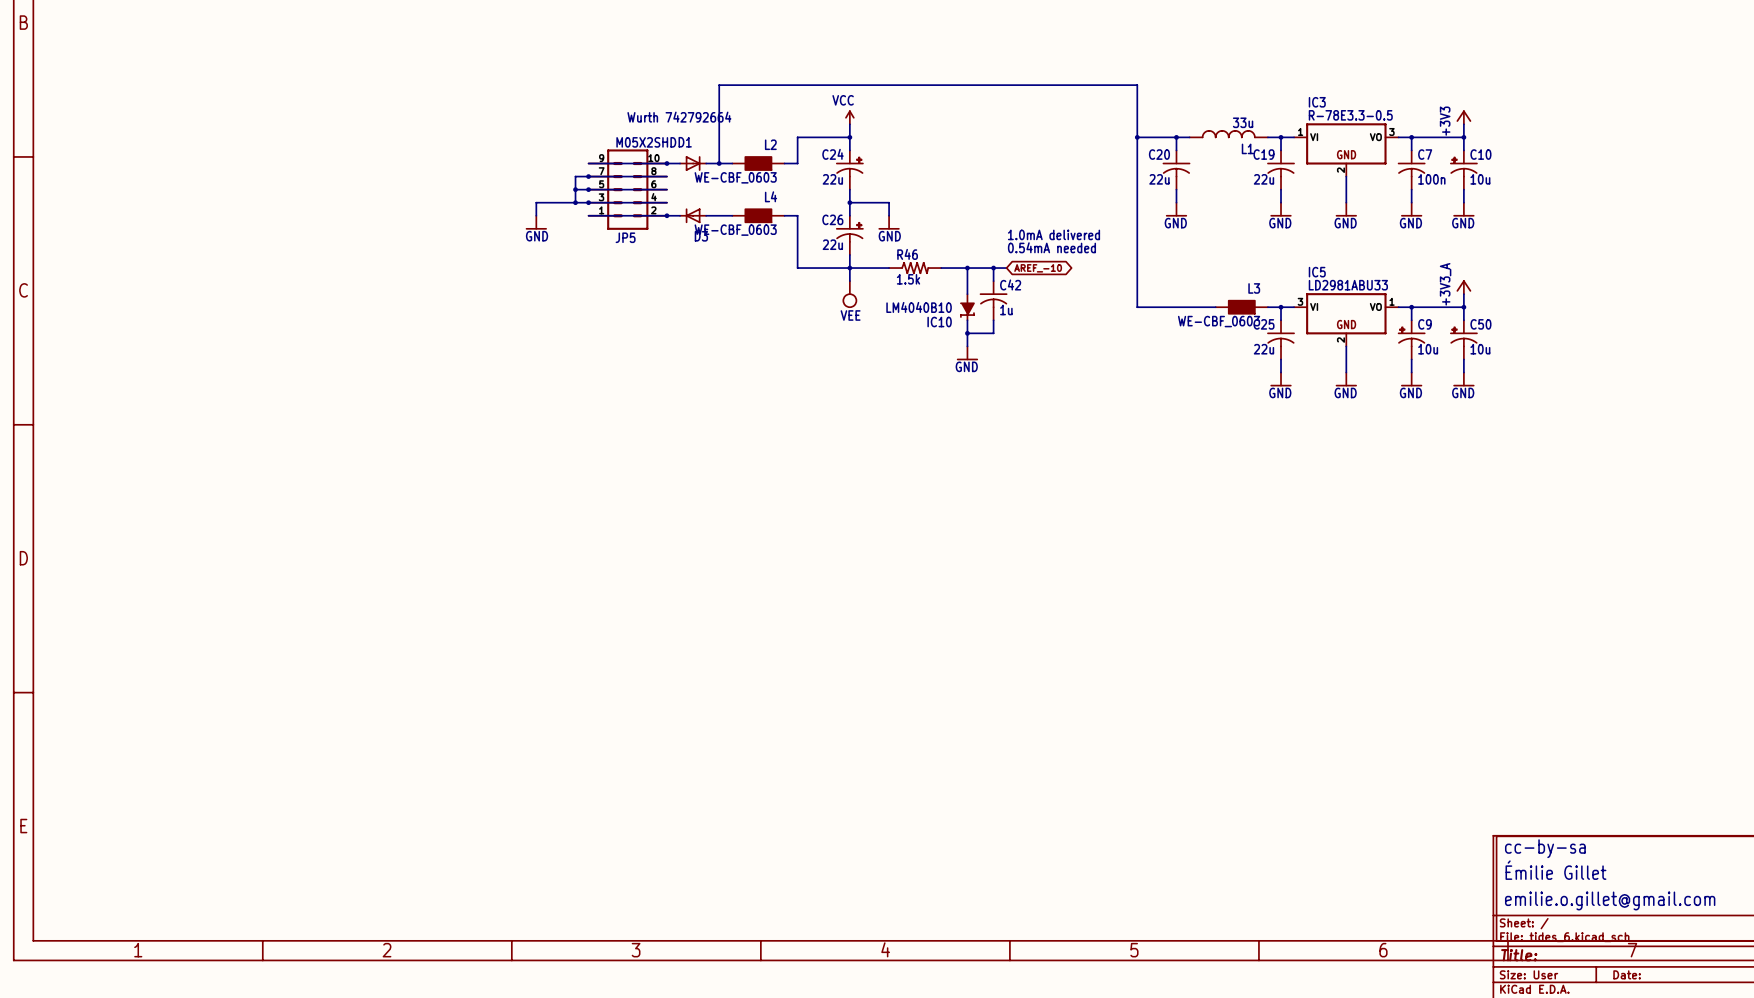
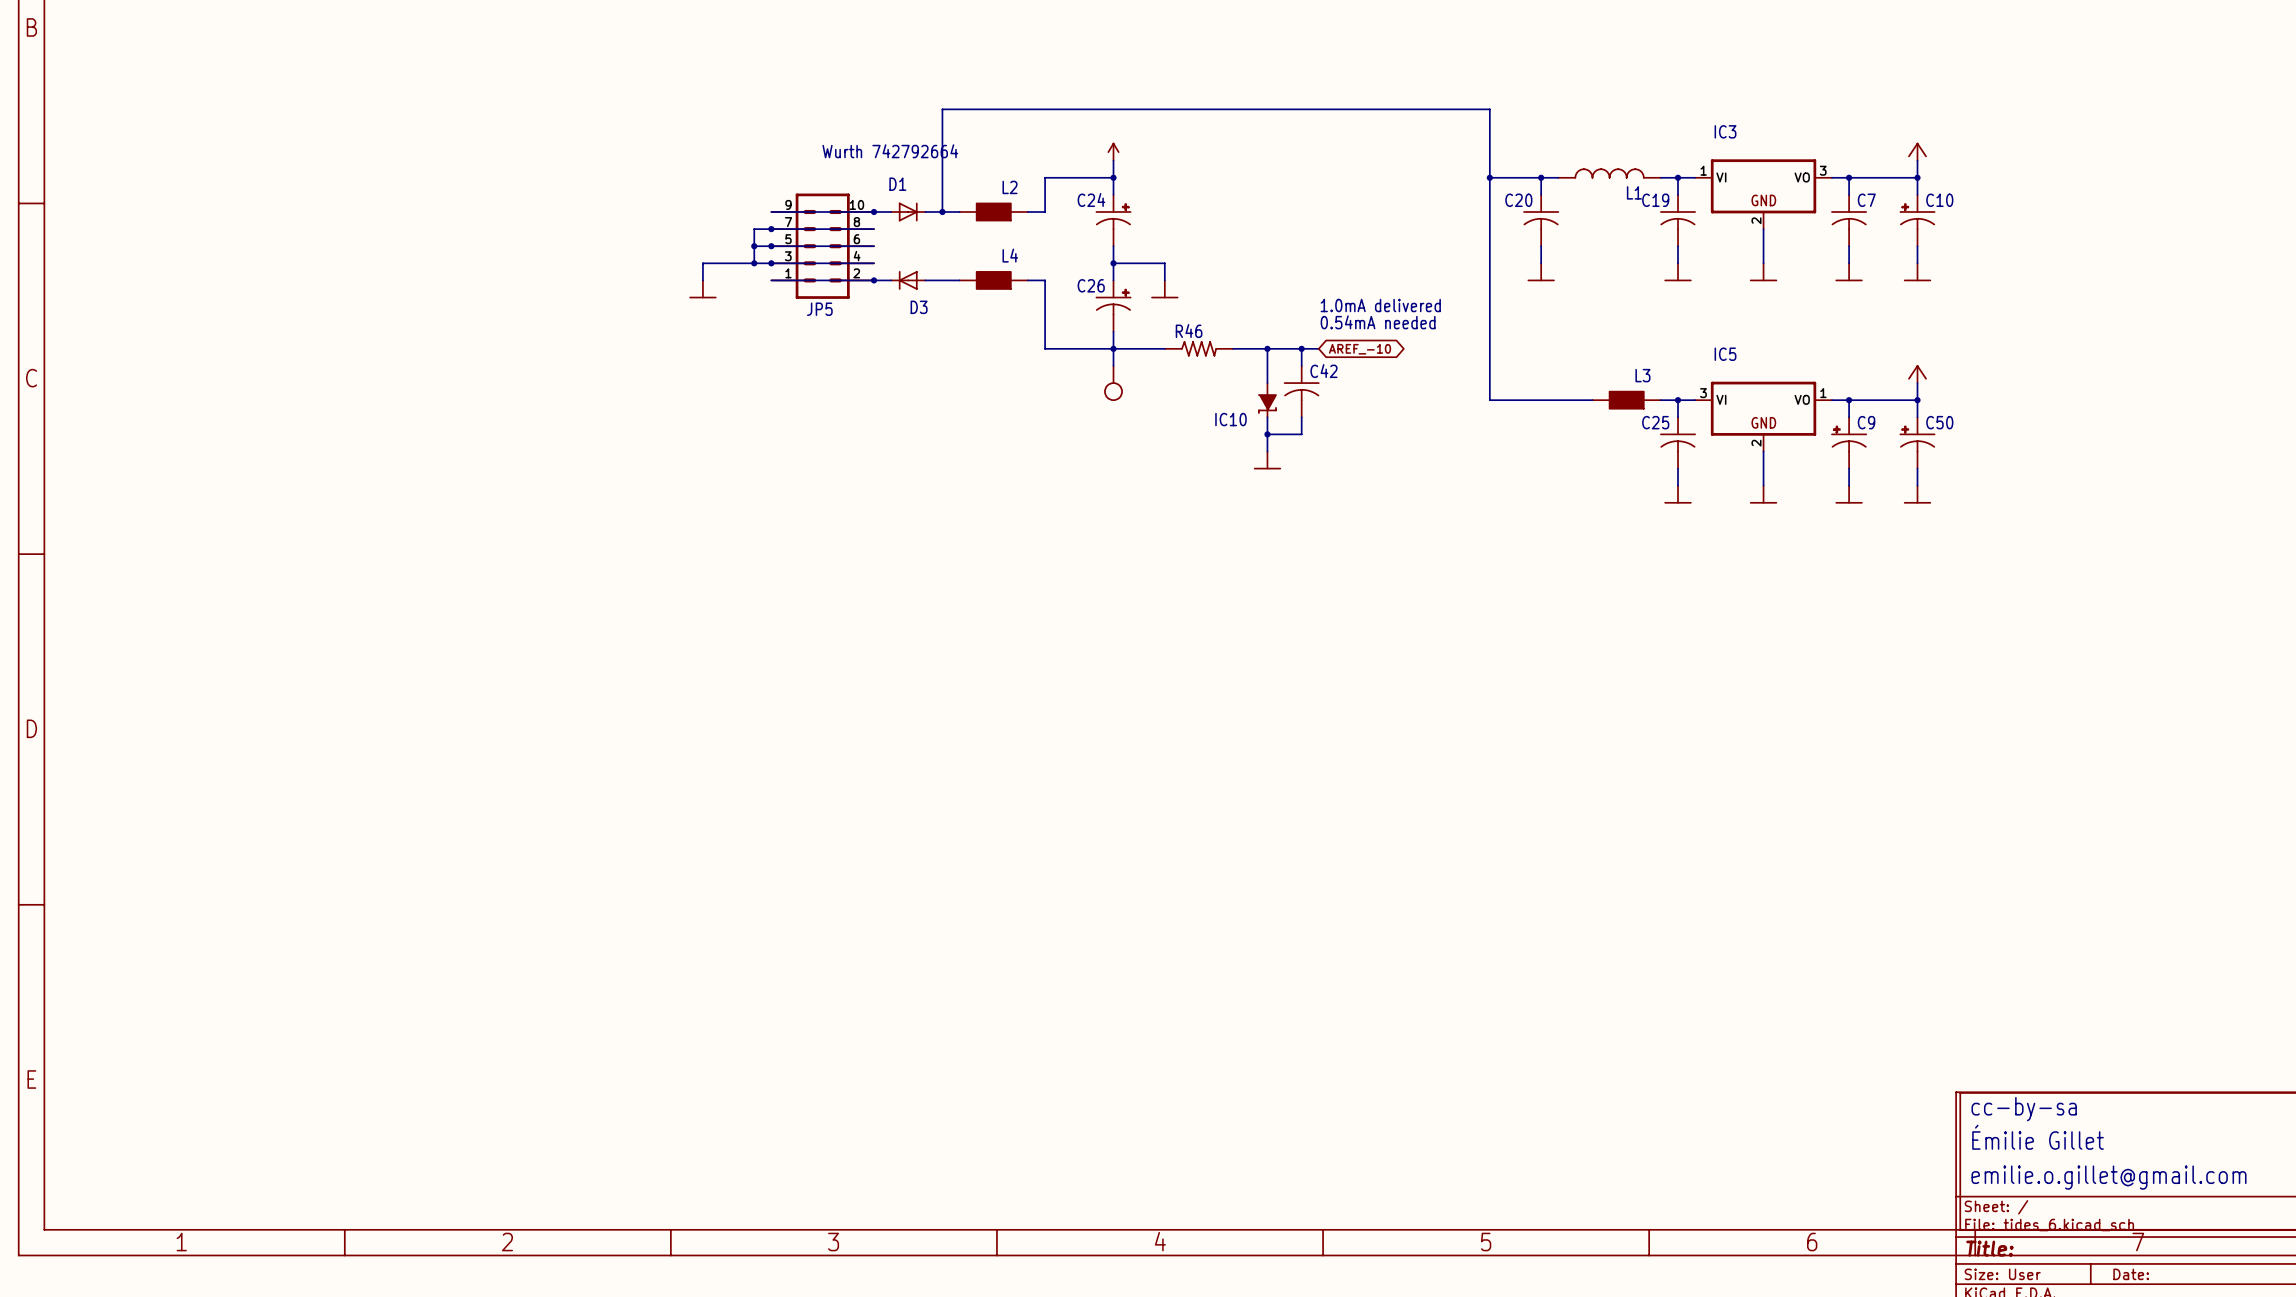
power symbol text: VCC (843, 100) -> none
IC3 value: R-78E3.3-0.5 (1350, 115) -> none
power symbol text: +3V3 (1445, 121) -> none
L1 value: 33u (1243, 122) -> none
JP5 value: M05X2SHD (646, 142) -> none
L2 value: WE-CBF_0603 (735, 177) -> none
C24 value: 22u (832, 179) -> none
C20 value: 22u (1159, 179) -> none
C19 value: 22u (1263, 179) -> none
C7 value: 100n (1431, 179) -> none
C10 value: 10u (1480, 179) -> none
power symbol text: GND (1175, 223) -> none
power symbol text: GND (1280, 223) -> none
power symbol text: GND (1345, 223) -> none
power symbol text: GND (1410, 223) -> none
power symbol text: GND (1463, 223) -> none
L4 value: WE-CBF_0603 (735, 230) -> none
power symbol text: GND (537, 236) -> none
power symbol text: GND (889, 236) -> none
C26 value: 22u (832, 244) -> none
R46 value: 1.5k (908, 279) -> none
power symbol text: +3V3_A (1445, 284) -> none
IC5 value: LD2981ABU33 (1348, 285) -> none
IC10 value: LM4040B10 (919, 307) -> none
C42 value: 1u (1006, 310) -> none
power symbol text: VEE (850, 315) -> none
L3 value: WE-CBF_0603 (1219, 321) -> none
C25 value: 22u (1263, 349) -> none
C9 value: 10u (1428, 349) -> none
C50 value: 10u (1480, 349) -> none
power symbol text: GND (966, 366) -> none
power symbol text: GND (1280, 392) -> none
power symbol text: GND (1345, 392) -> none
power symbol text: GND (1410, 392) -> none
power symbol text: GND (1463, 392) -> none

